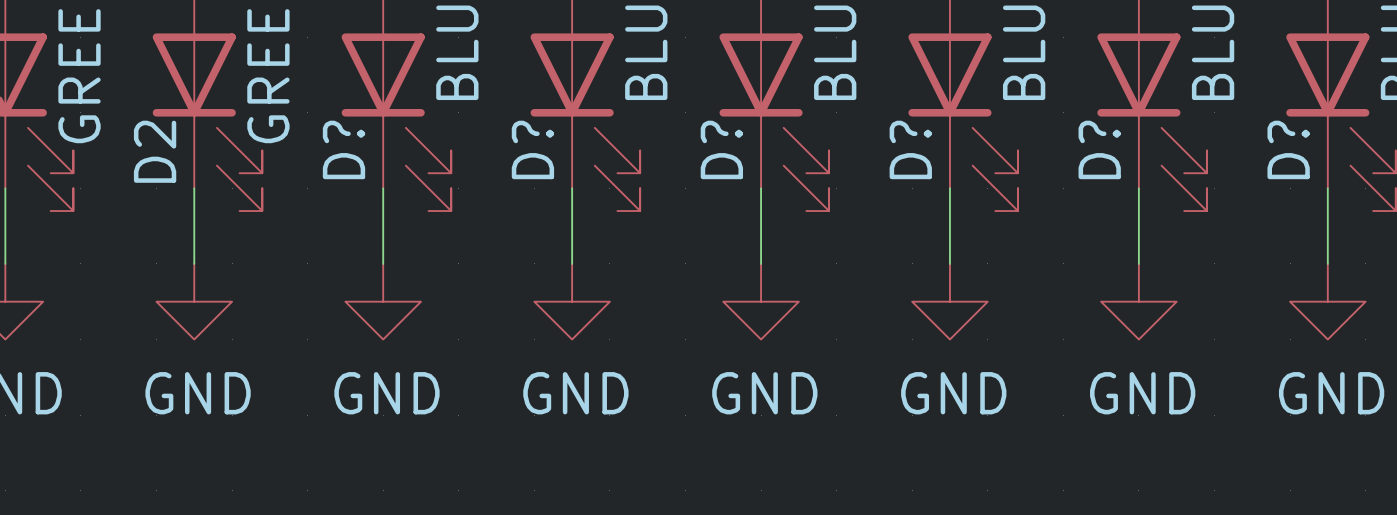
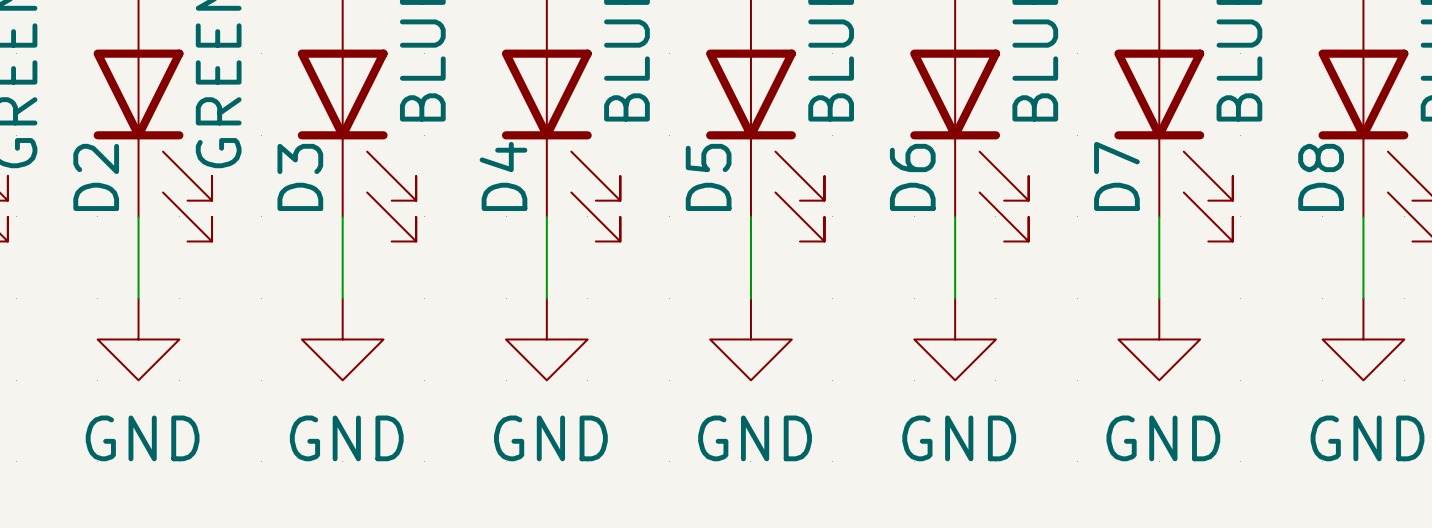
D? name: D? (344, 149) -> D3 (300, 177)
D? name: D? (532, 149) -> D4 (503, 176)
D? name: D? (721, 149) -> D5 (708, 177)
D? name: D? (910, 149) -> D6 (912, 177)
D? name: D? (1099, 149) -> D7 (1116, 176)
D? name: D? (1288, 149) -> D8 (1321, 177)

